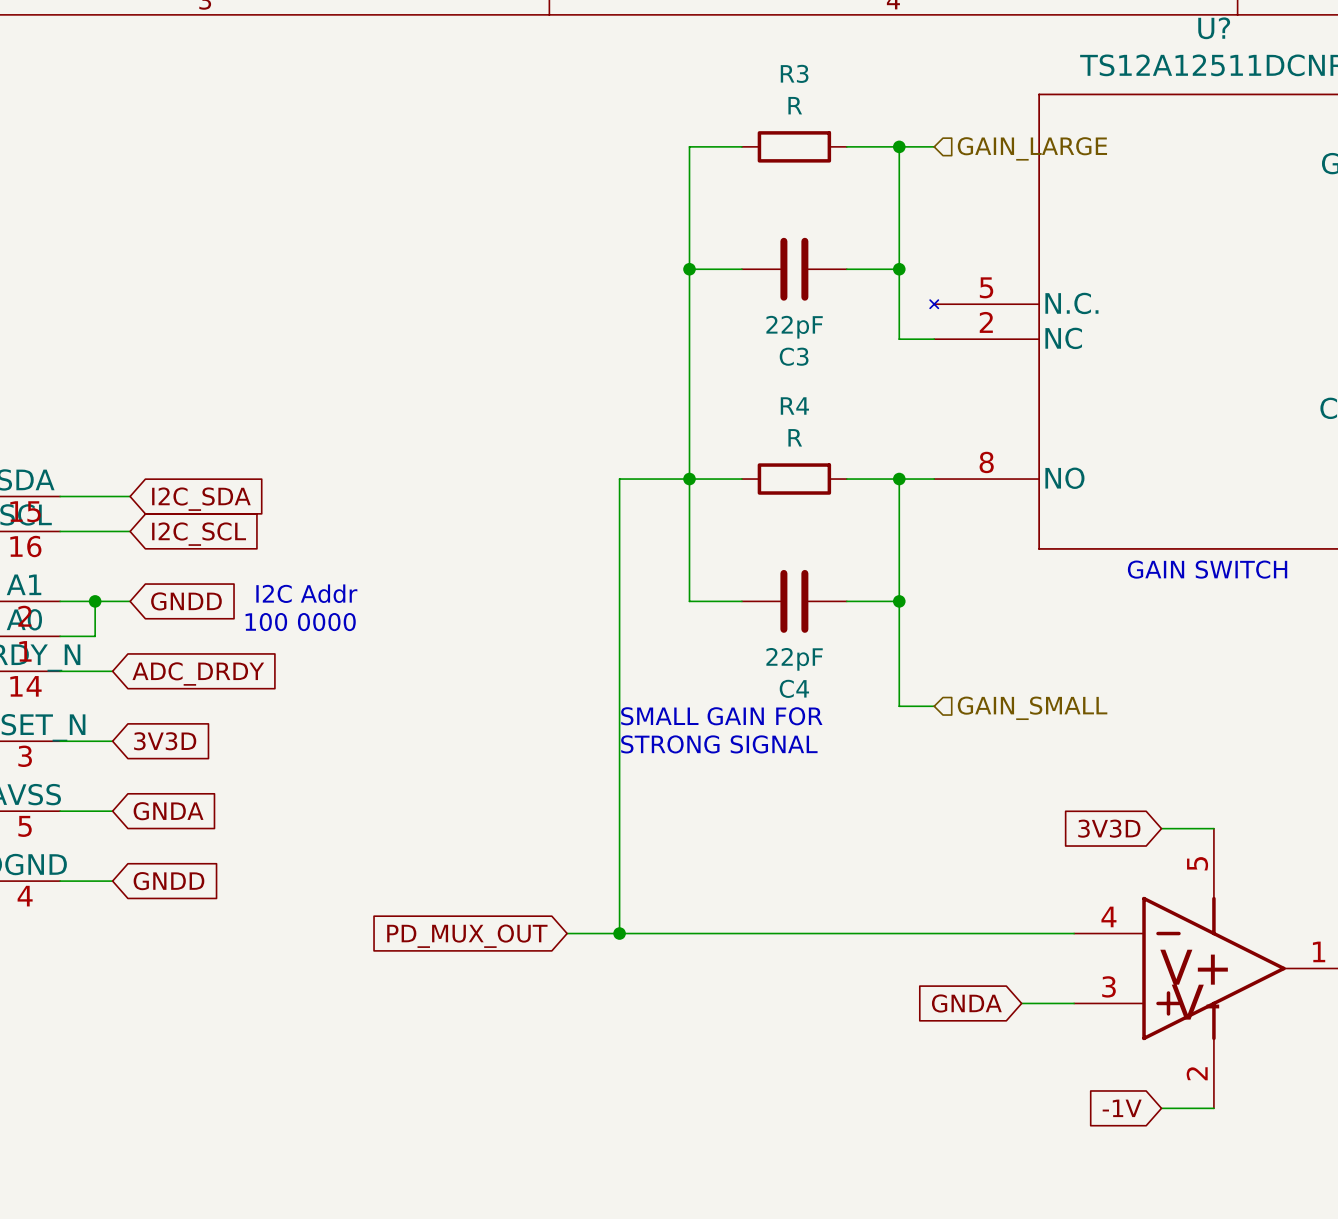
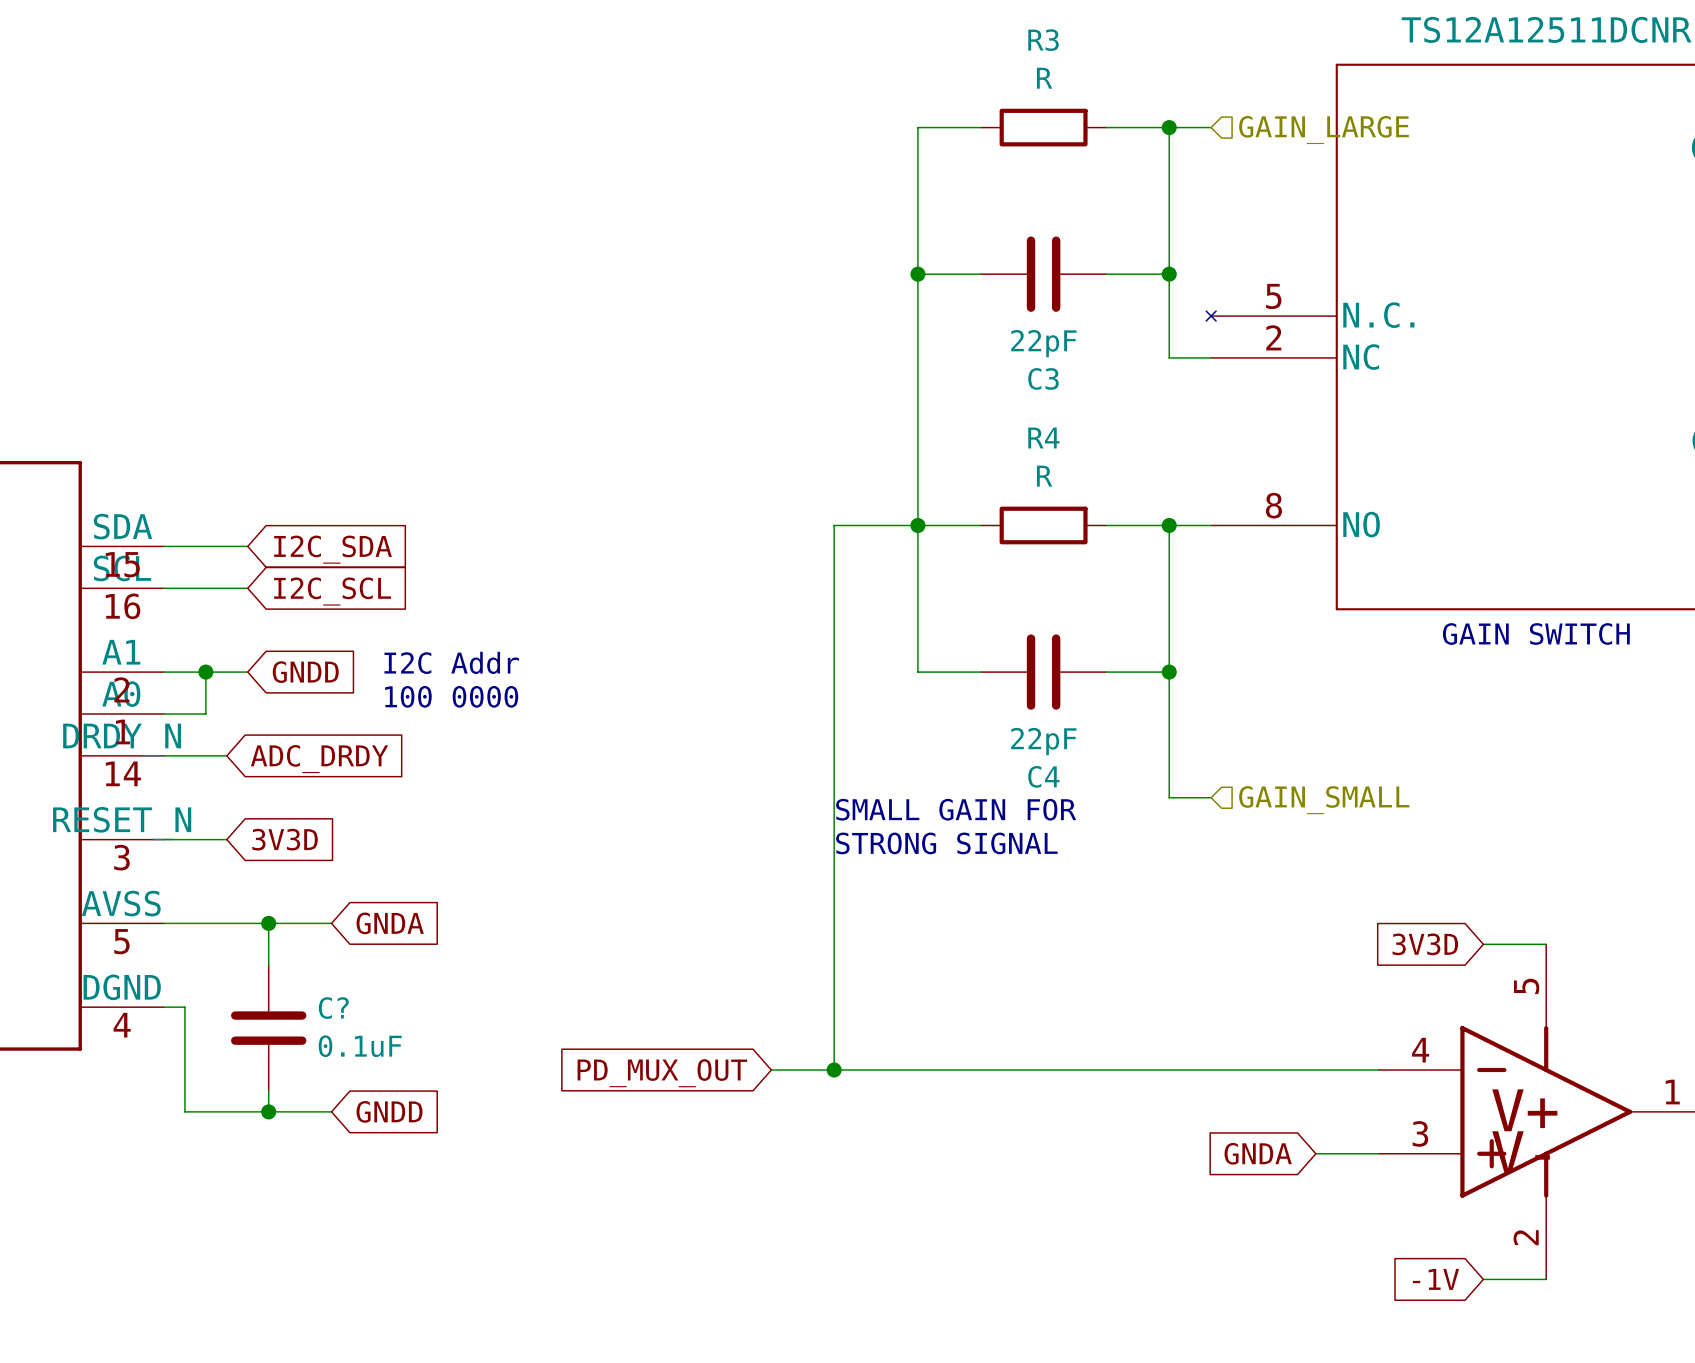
wire: none -> (226, 923) (331, 923)
wire: none -> (268, 923) (268, 965)
junction: none -> (268, 923)
global label position: GNDA (168, 811) -> GNDA (390, 923)
wire: (77, 881) (112, 881) -> (184, 1007) (184, 1111) (331, 1111)
global label position: GNDD (168, 881) -> GNDD (389, 1111)
C?: none -> 0.1uF (268, 1028)
wire: none -> (268, 1090) (268, 1111)
junction: none -> (268, 1111)

